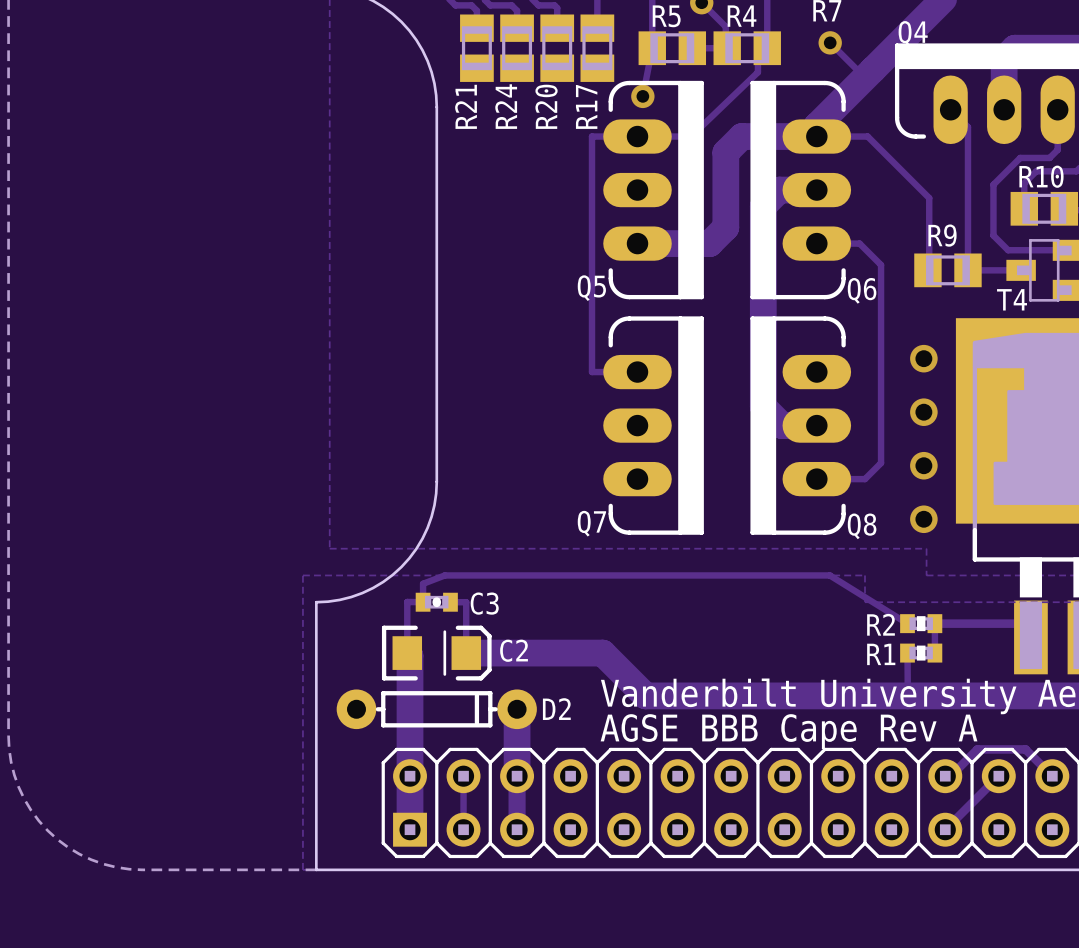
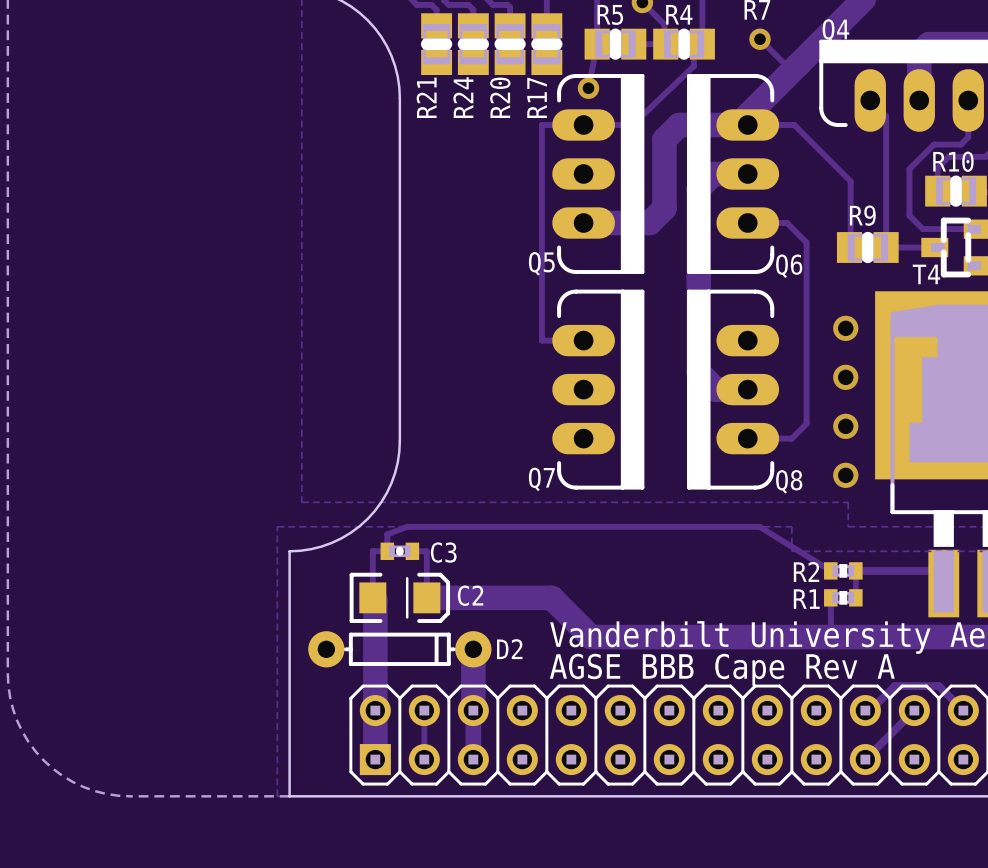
line: none -> (615, 34) (615, 53)
line: none -> (684, 34) (684, 53)
line: none -> (426, 44) (446, 44)
line: none -> (463, 44) (483, 44)
line: none -> (500, 44) (519, 44)
line: none -> (537, 44) (556, 44)
line: none -> (956, 181) (956, 200)
line: none -> (968, 220) (943, 220) (943, 240)
line: none -> (968, 235) (968, 259)
line: none -> (867, 237) (867, 257)
line: none -> (943, 252) (943, 274) (968, 274)

